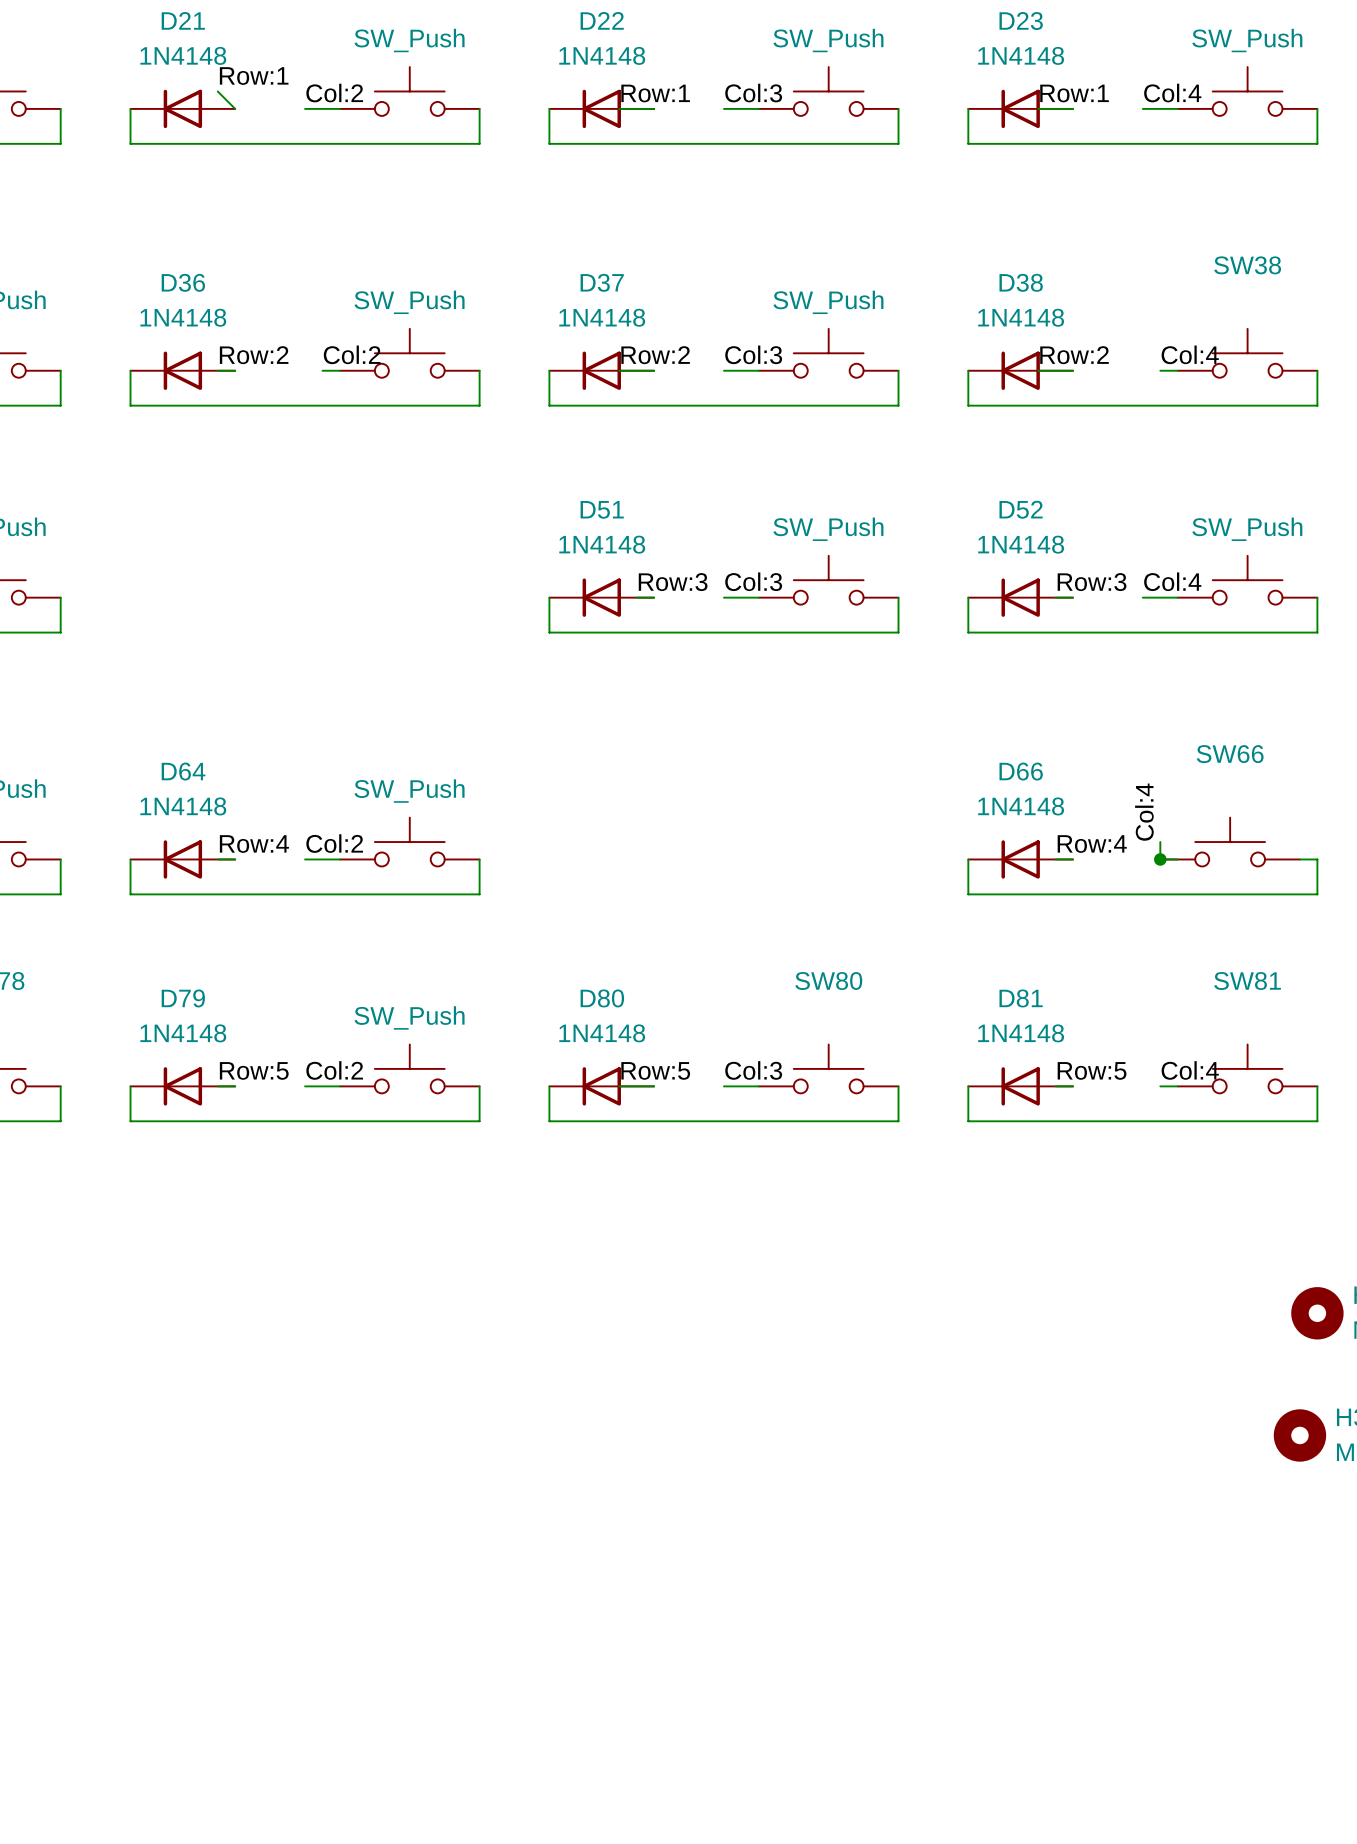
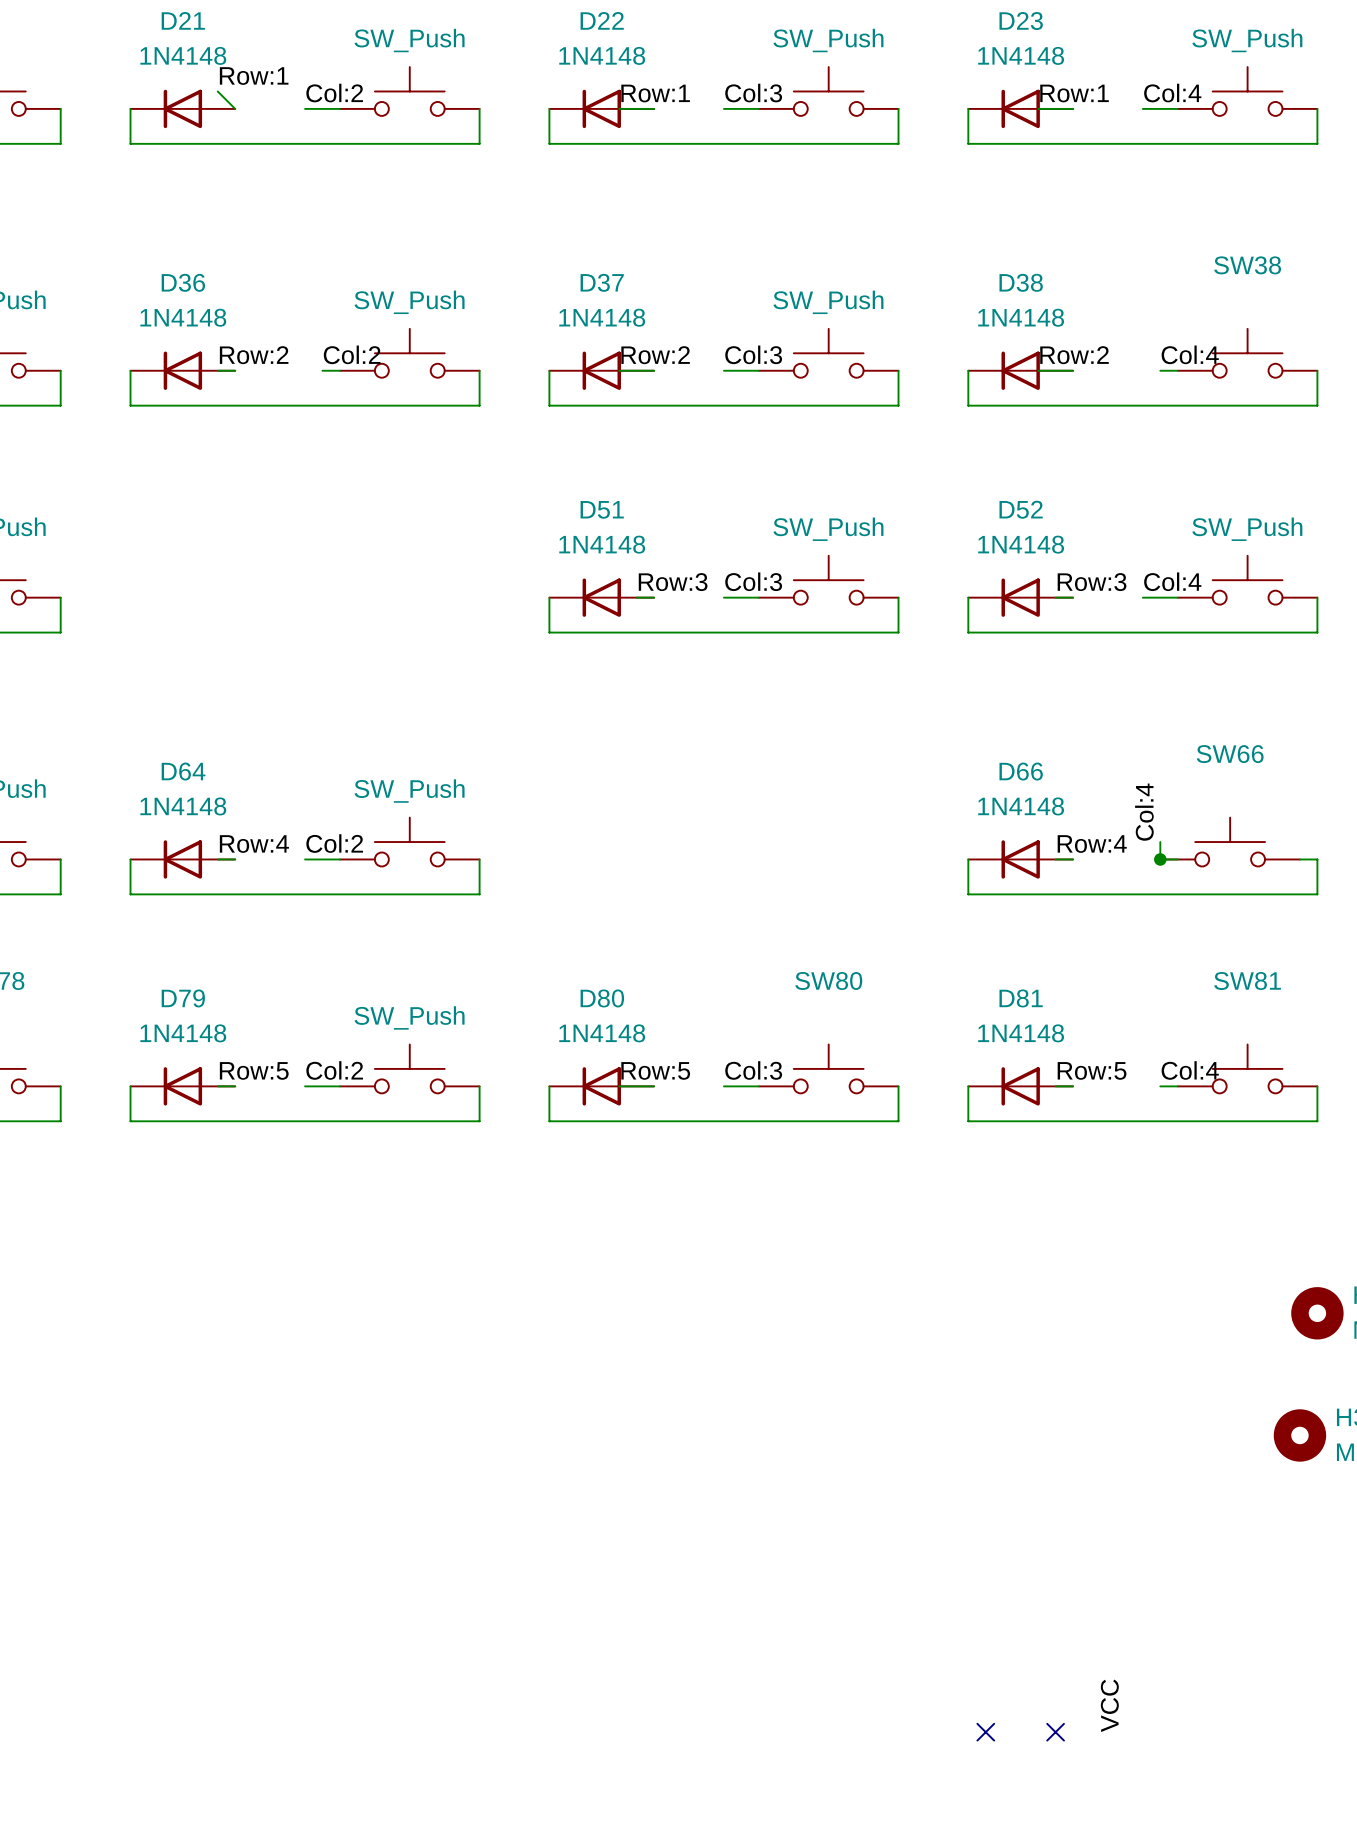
label: none -> VCC (1109, 1705)
no-connect mark: none -> (985, 1732)
no-connect mark: none -> (1055, 1732)

